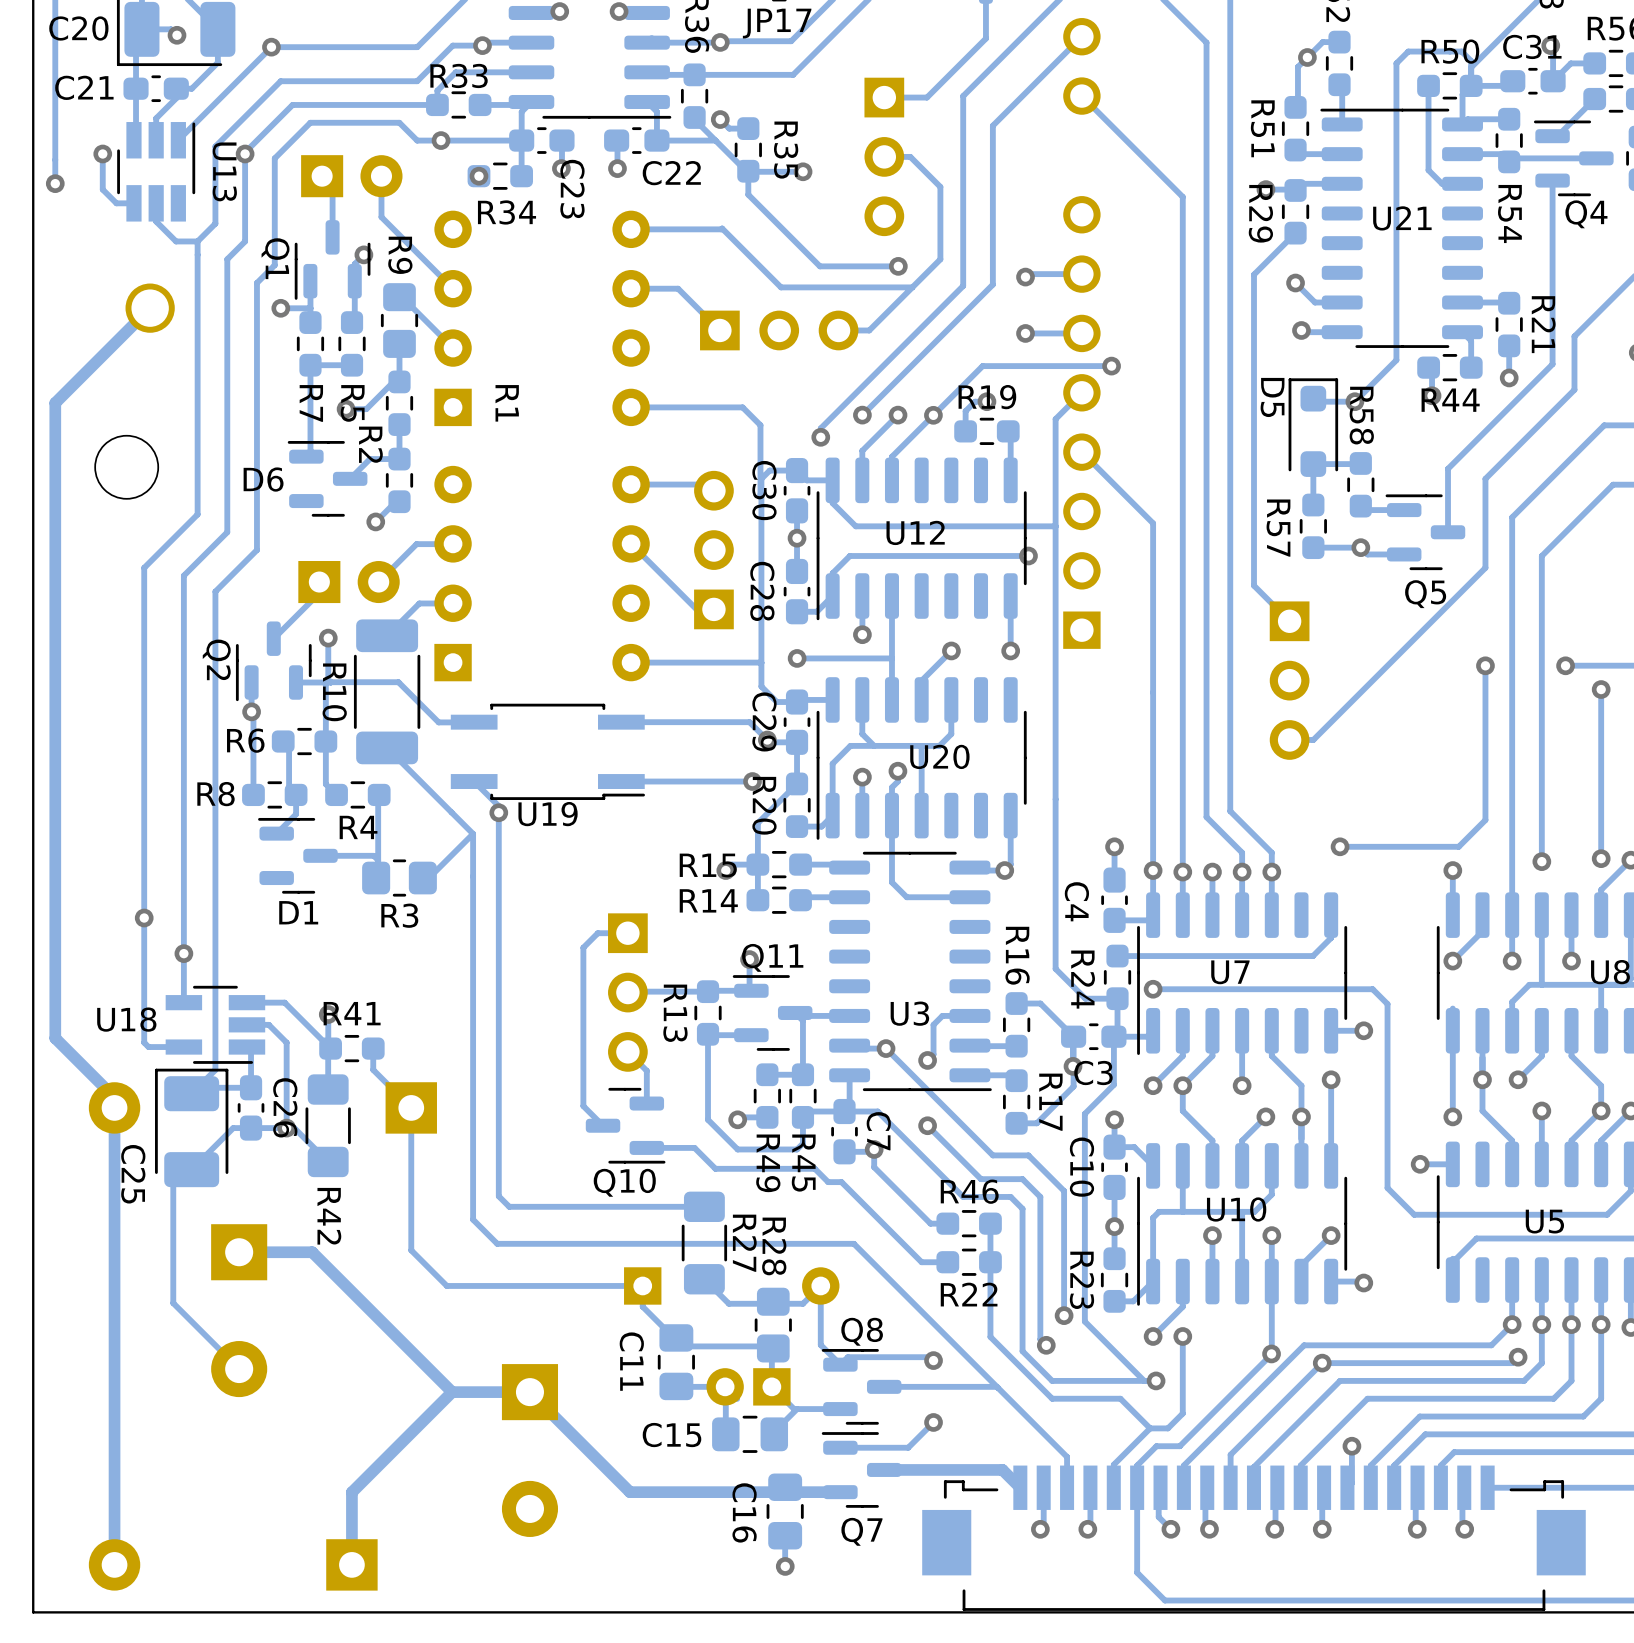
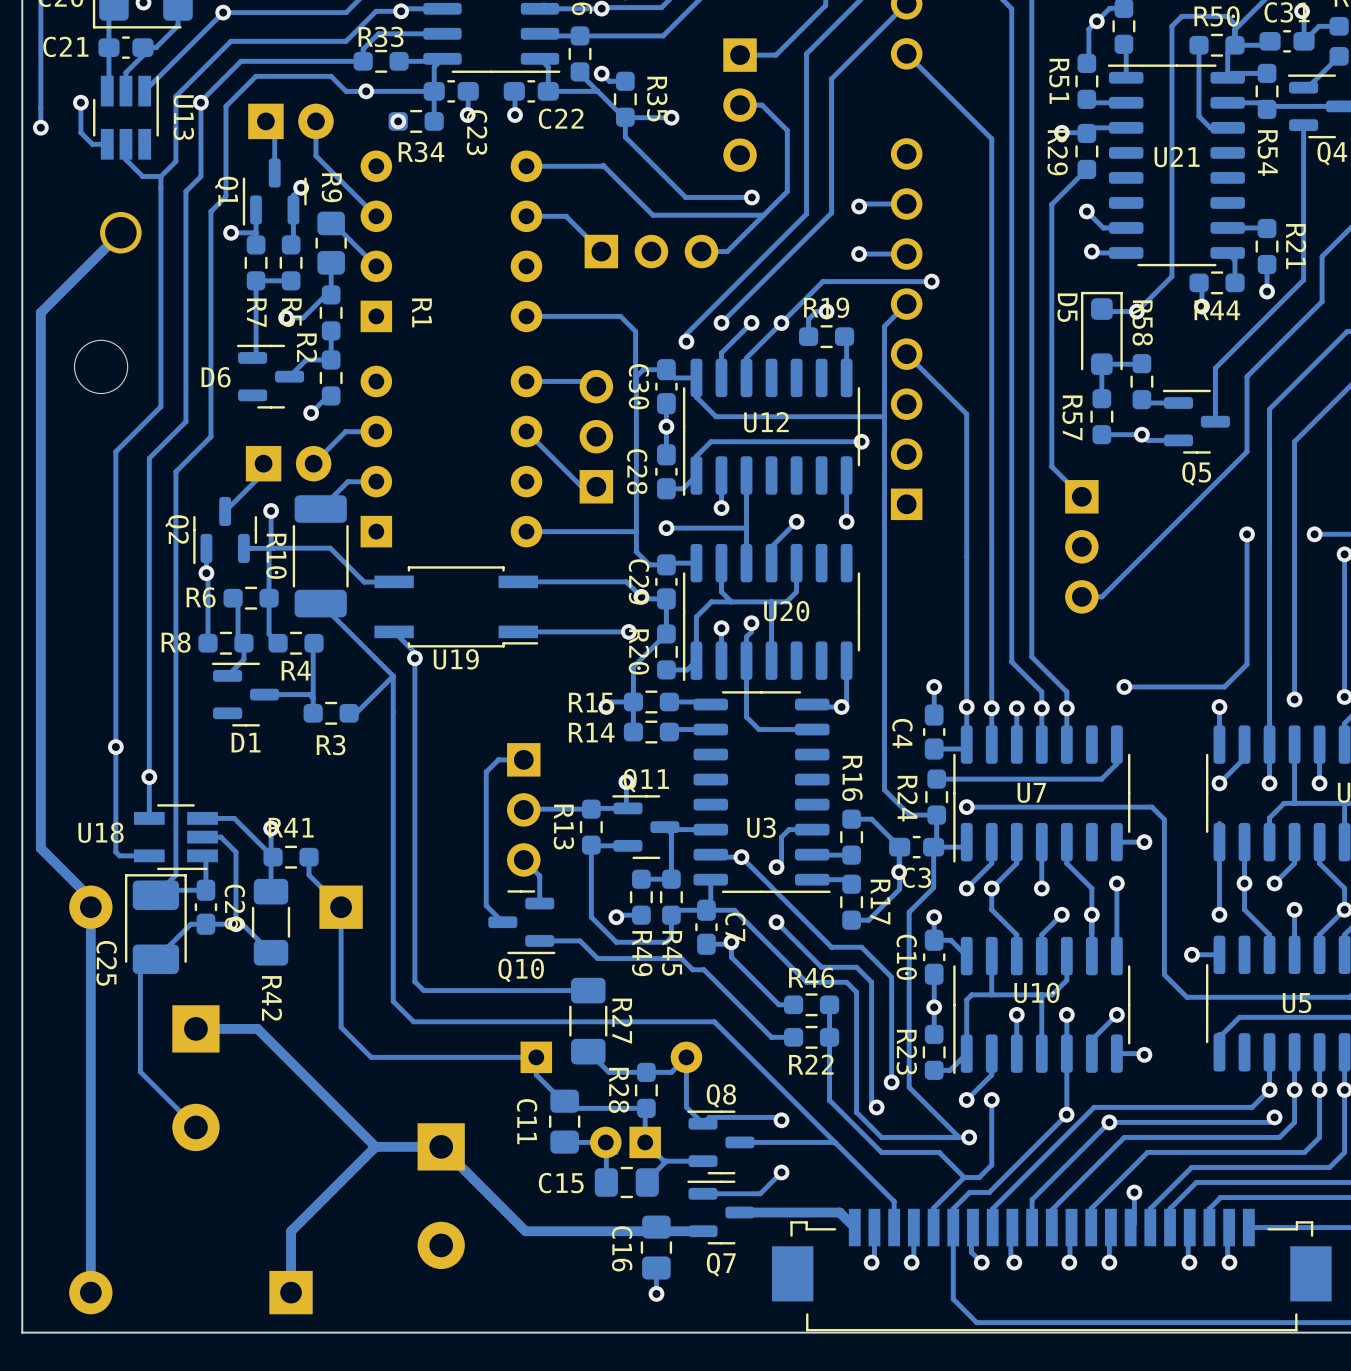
R3 footprint: [362, 859, 437, 897] -> [303, 701, 359, 725]
R28 name position: R28 (774, 1246) -> R28 (618, 1090)
R28 footprint: [754, 1287, 792, 1363] -> [634, 1062, 658, 1118]

